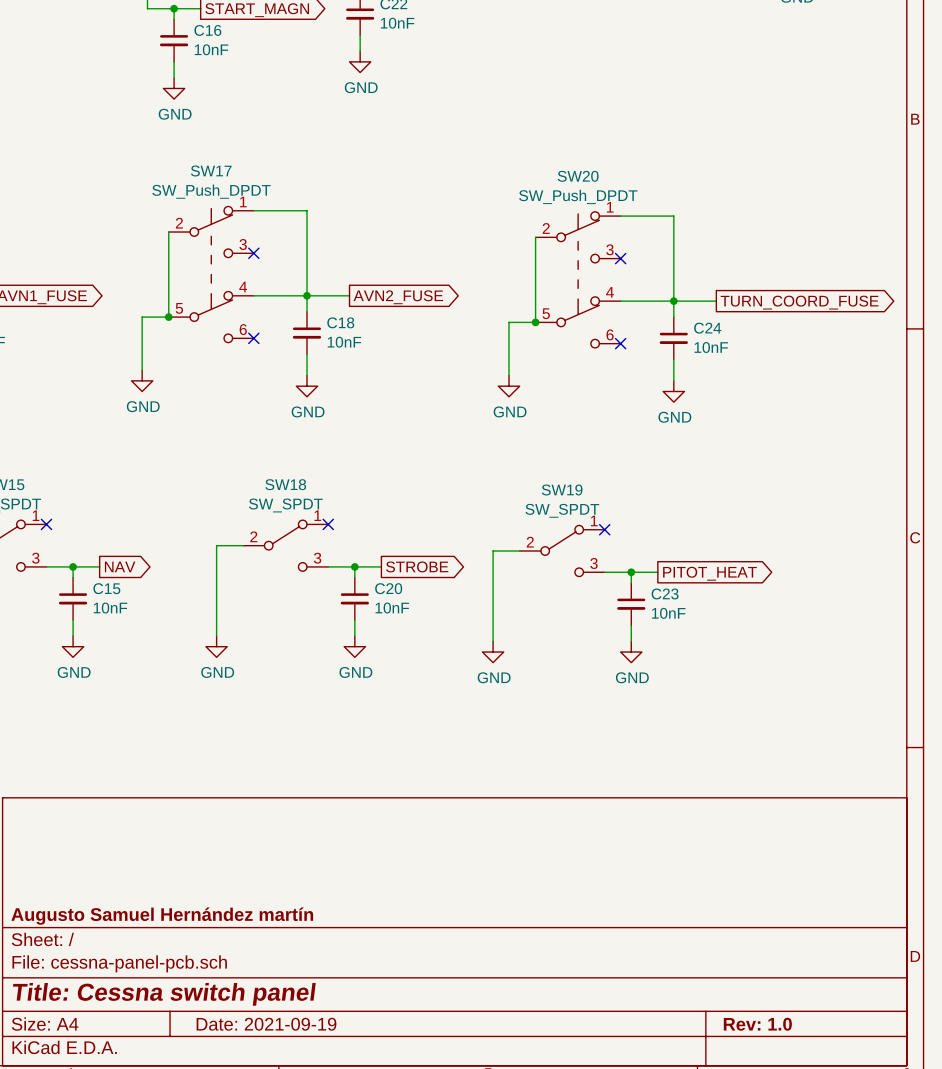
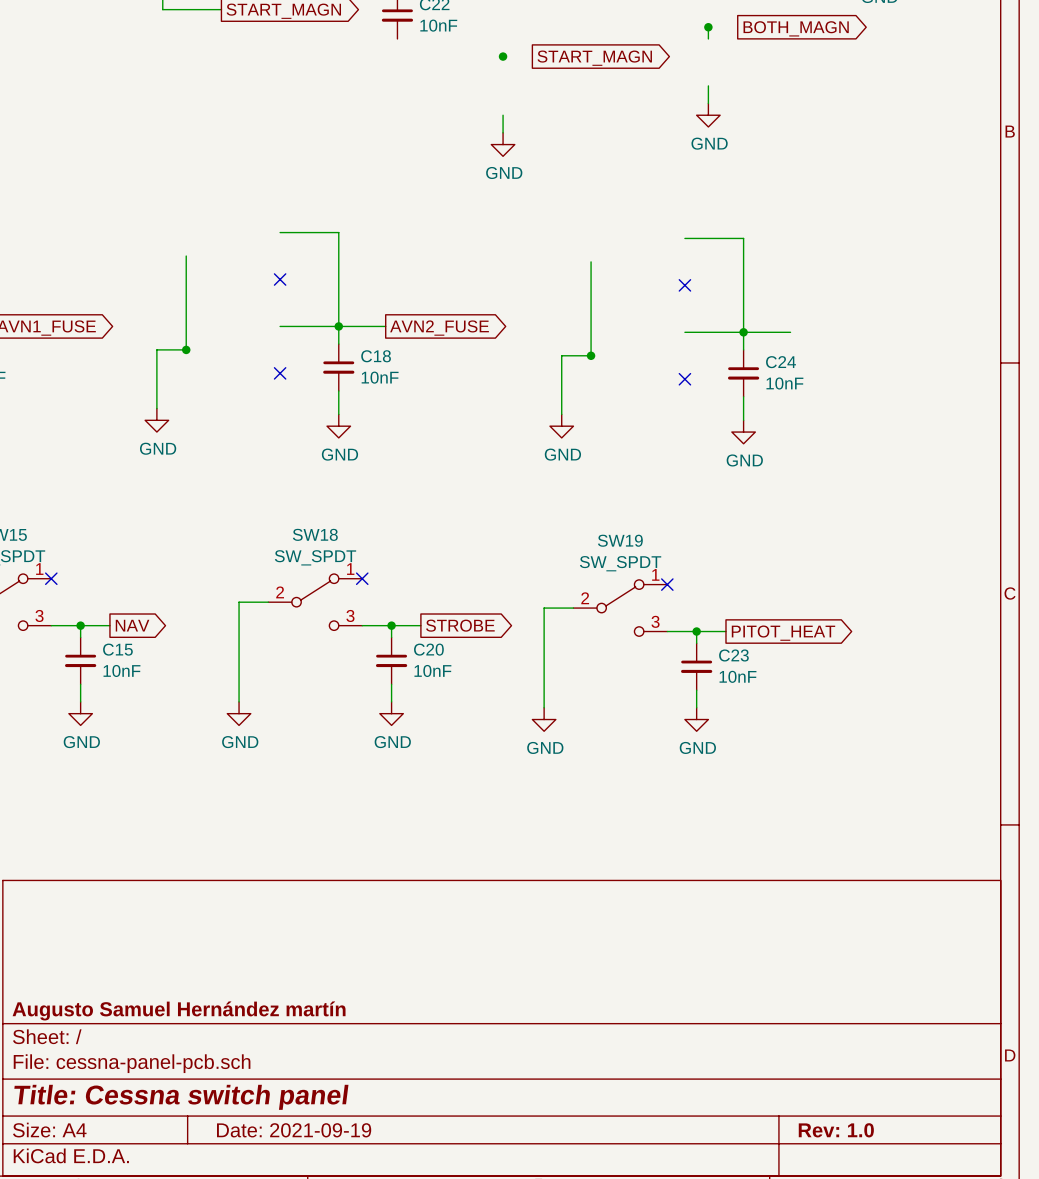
wire: (174, 8) (174, 19) -> none
junction: (174, 8) -> none
wire: none -> (708, 27) (708, 38)
junction: none -> (708, 27)
global label: none -> BOTH_MAGN (796, 28)
wire: (360, 35) (360, 51) -> (503, 115) (503, 132)
C16: 10nF (174, 40) -> none
junction: none -> (503, 56)
global label: none -> START_MAGN (594, 58)
wire: (174, 61) (174, 77) -> none
power symbol: GND (360, 61) -> none
wire: none -> (708, 85) (708, 103)
power symbol: GND (174, 88) -> none
power symbol: none -> GND (708, 115)
power symbol: none -> GND (503, 144)
SW17: SW_Push_DPDT (211, 274) -> none
SW20: SW_Push_DPDT (578, 279) -> none
global label: TURN_COORD_FUSE (799, 302) -> none

